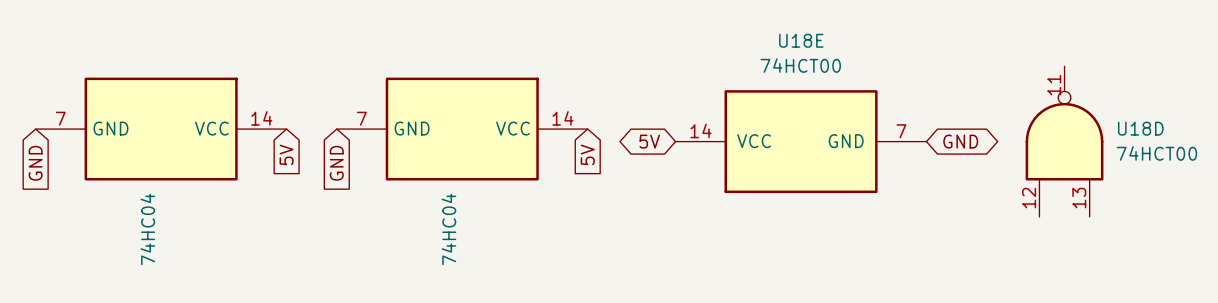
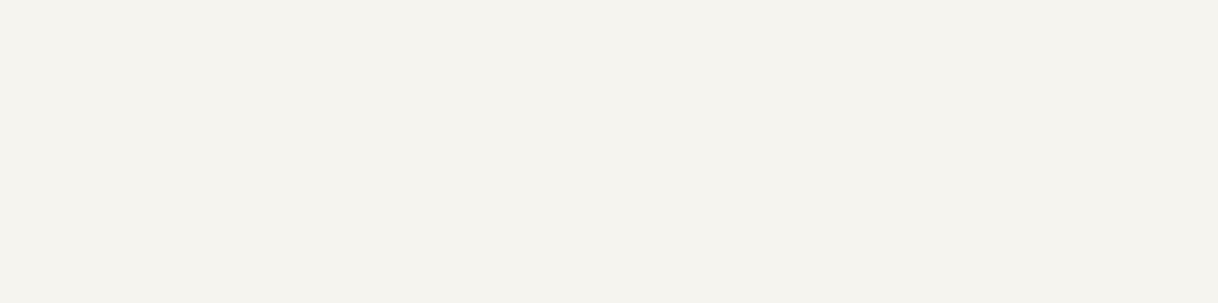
part: 74HC04 (161, 129) -> none
part: 74HC04 (462, 129) -> none
global label: 5V (649, 141) -> none
U18E: 74HCT00 (801, 141) -> none
global label: GND (960, 141) -> none
U18D: 74HCT00 (1064, 141) -> none
global label: 5V (286, 154) -> none
global label: 5V (587, 154) -> none
global label: GND (35, 163) -> none
global label: GND (336, 163) -> none

